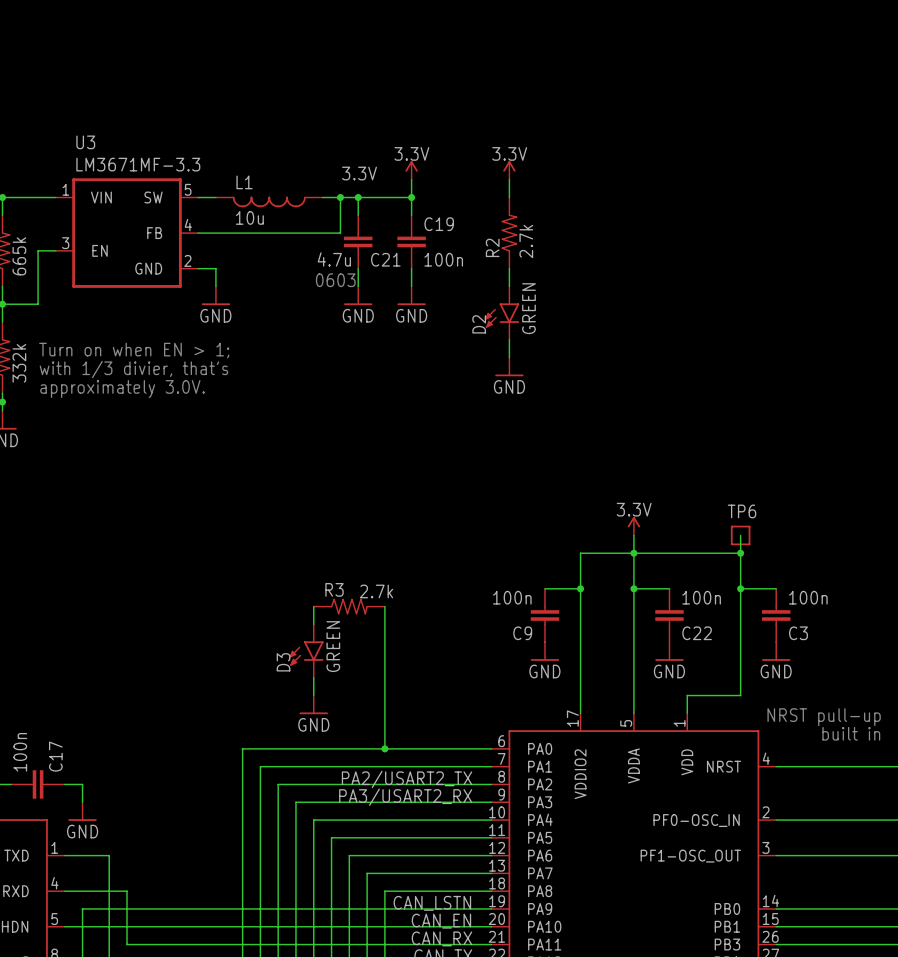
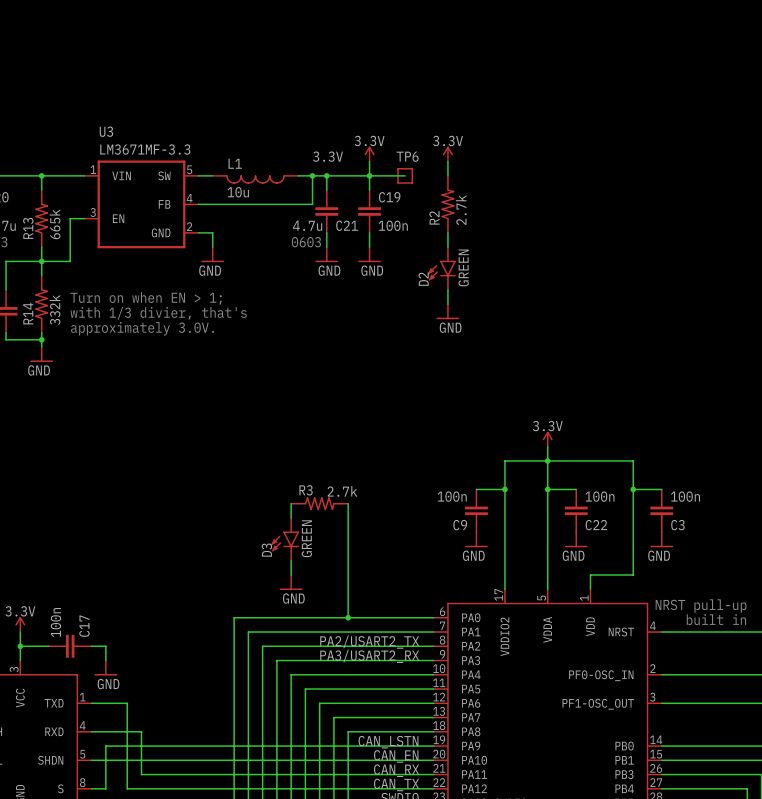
wire: none -> (369, 175) (405, 175)
wire: (740, 535) (740, 553) -> none
TP6 position: (740, 535) -> (405, 175)
junction: (740, 553) -> none
text: NRST pull-up (824, 717) -> none
text: built in (851, 733) -> NRST pull-up (701, 606)
text: none -> built in (716, 619)

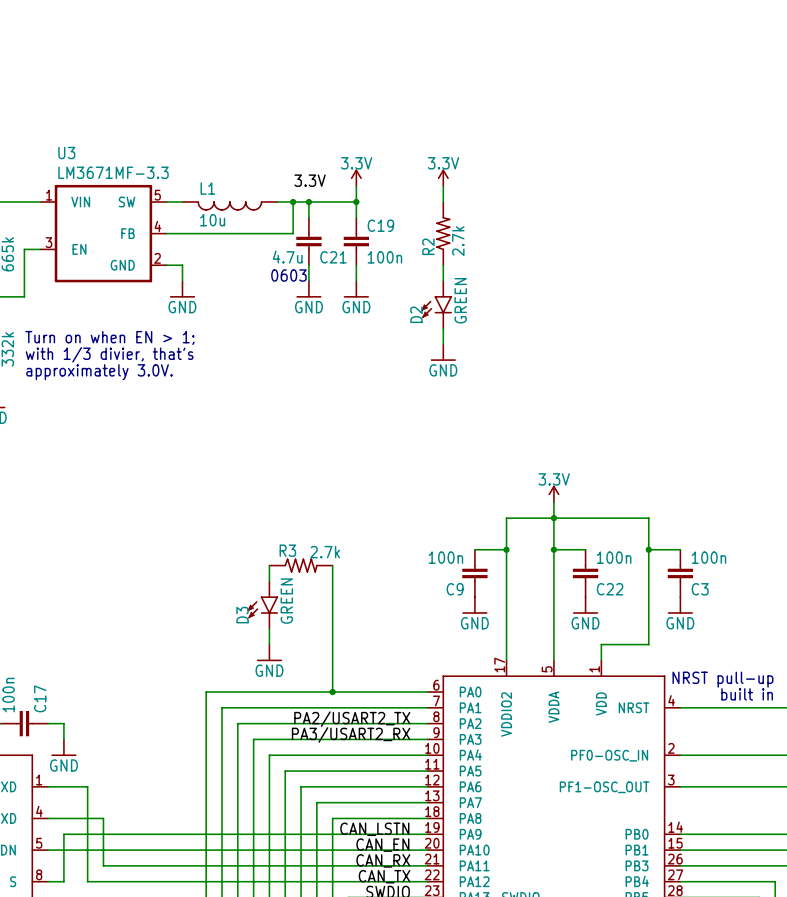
wire: (369, 175) (405, 175) -> none
TP6: (405, 175) -> none

